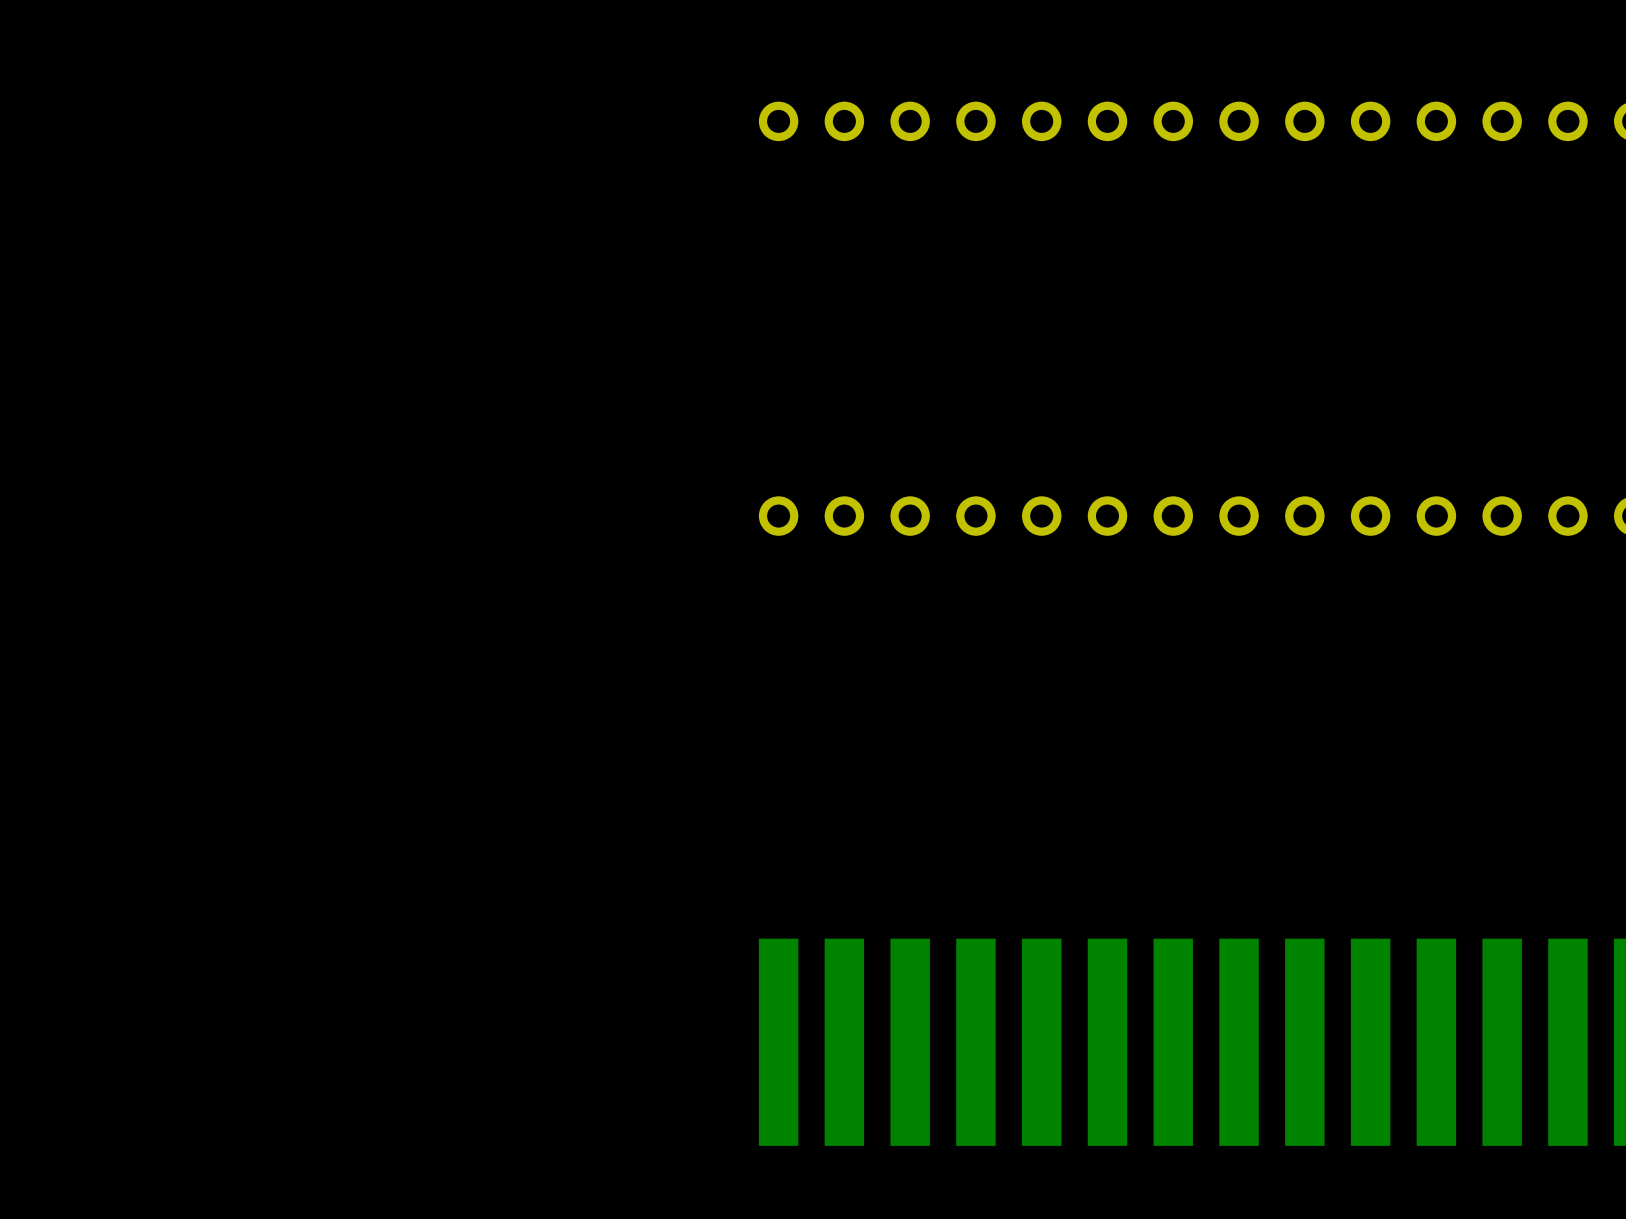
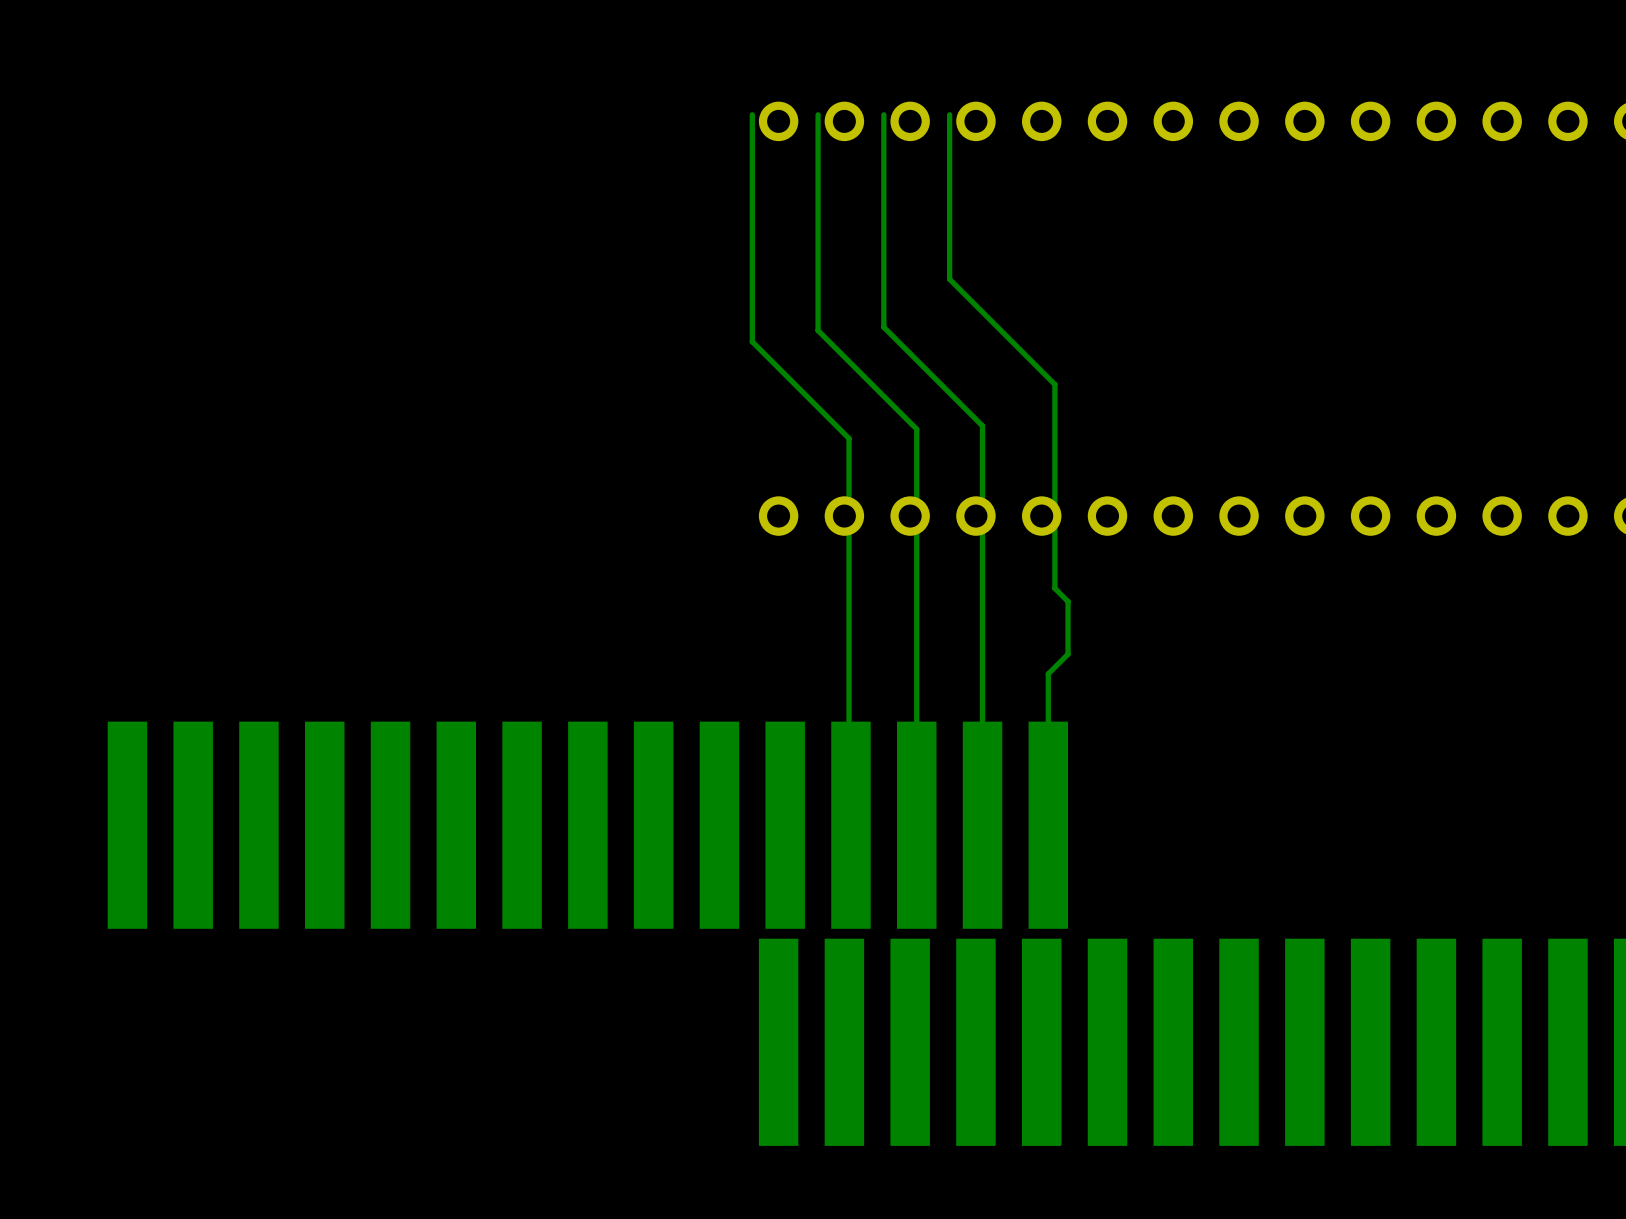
track: none -> (752, 114) (752, 341) (848, 438) (848, 823) (850, 825)
track: none -> (818, 114) (818, 330) (916, 429) (916, 825)
track: none -> (883, 114) (883, 327) (982, 425) (982, 825)
track: none -> (949, 114) (949, 279) (1054, 384) (1054, 588) (1068, 601) (1068, 654) (1048, 673) (1048, 825)
part: none -> (587, 825)

